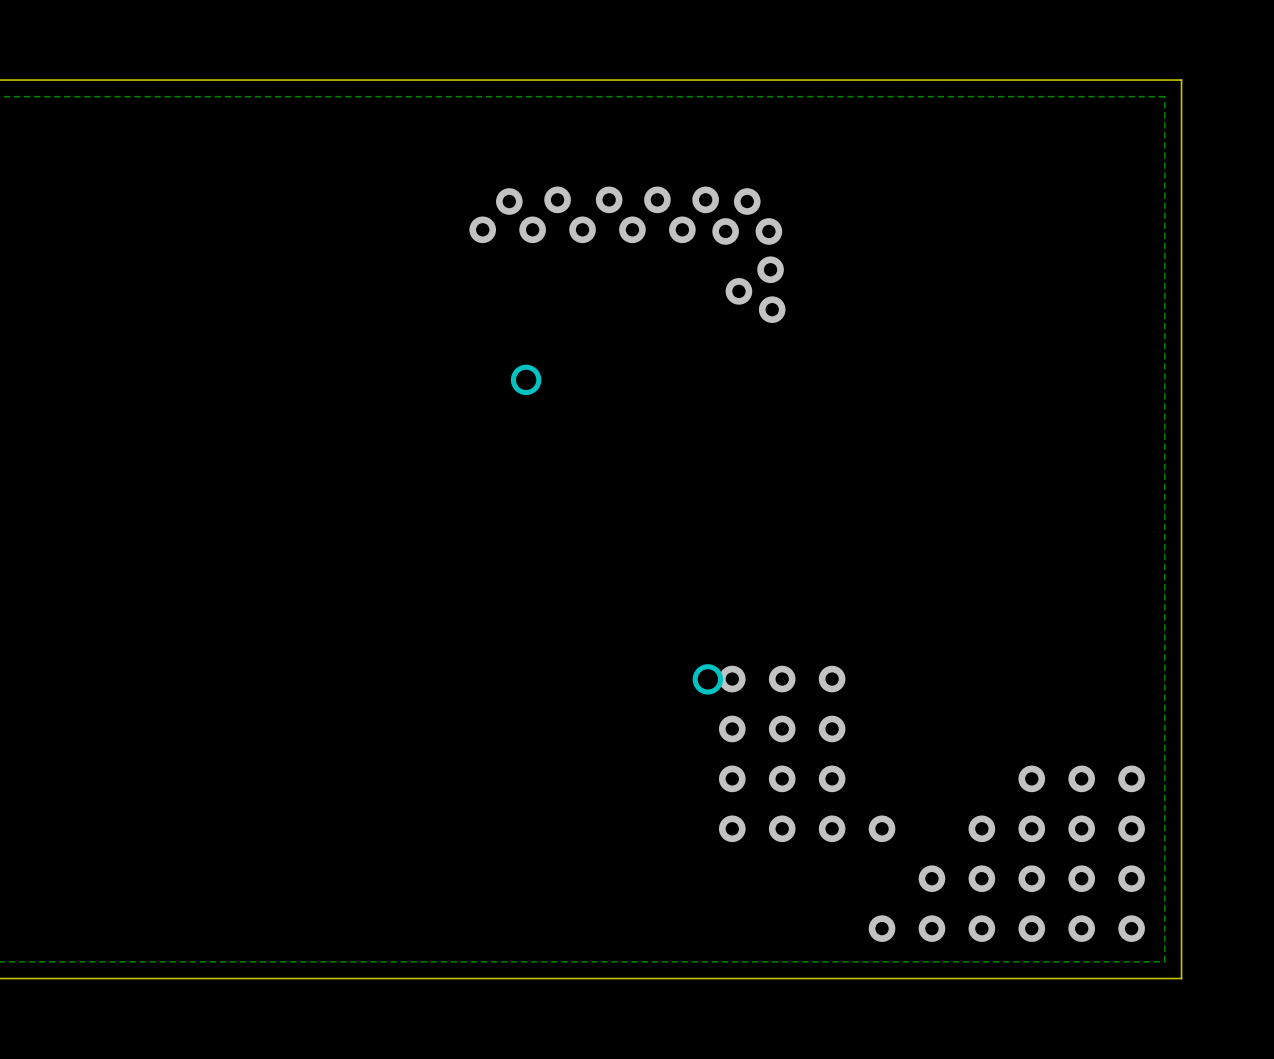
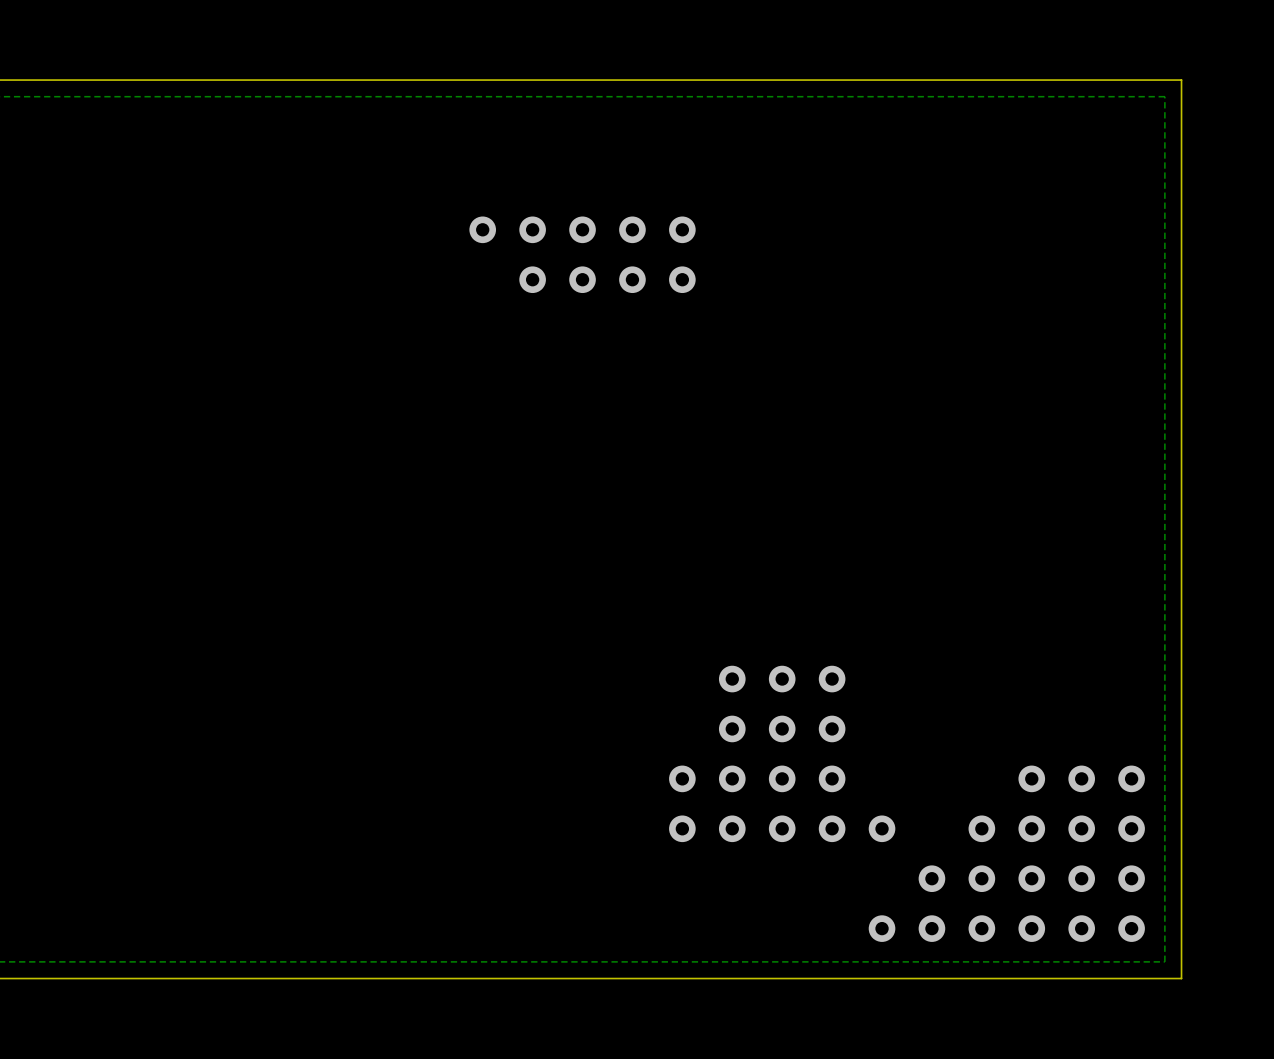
via: (557, 199) -> none
via: (609, 199) -> none
via: (657, 199) -> none
via: (705, 199) -> none
via: (509, 201) -> none
via: (747, 201) -> none
via: (725, 231) -> none
via: (768, 231) -> none
via: (770, 269) -> none
via: none -> (532, 279)
via: none -> (582, 279)
via: none -> (632, 279)
via: none -> (682, 279)
via: (738, 291) -> none
via: (772, 309) -> none
part: (526, 379) -> none
part: (707, 679) -> none
via: none -> (682, 778)
via: none -> (682, 828)

